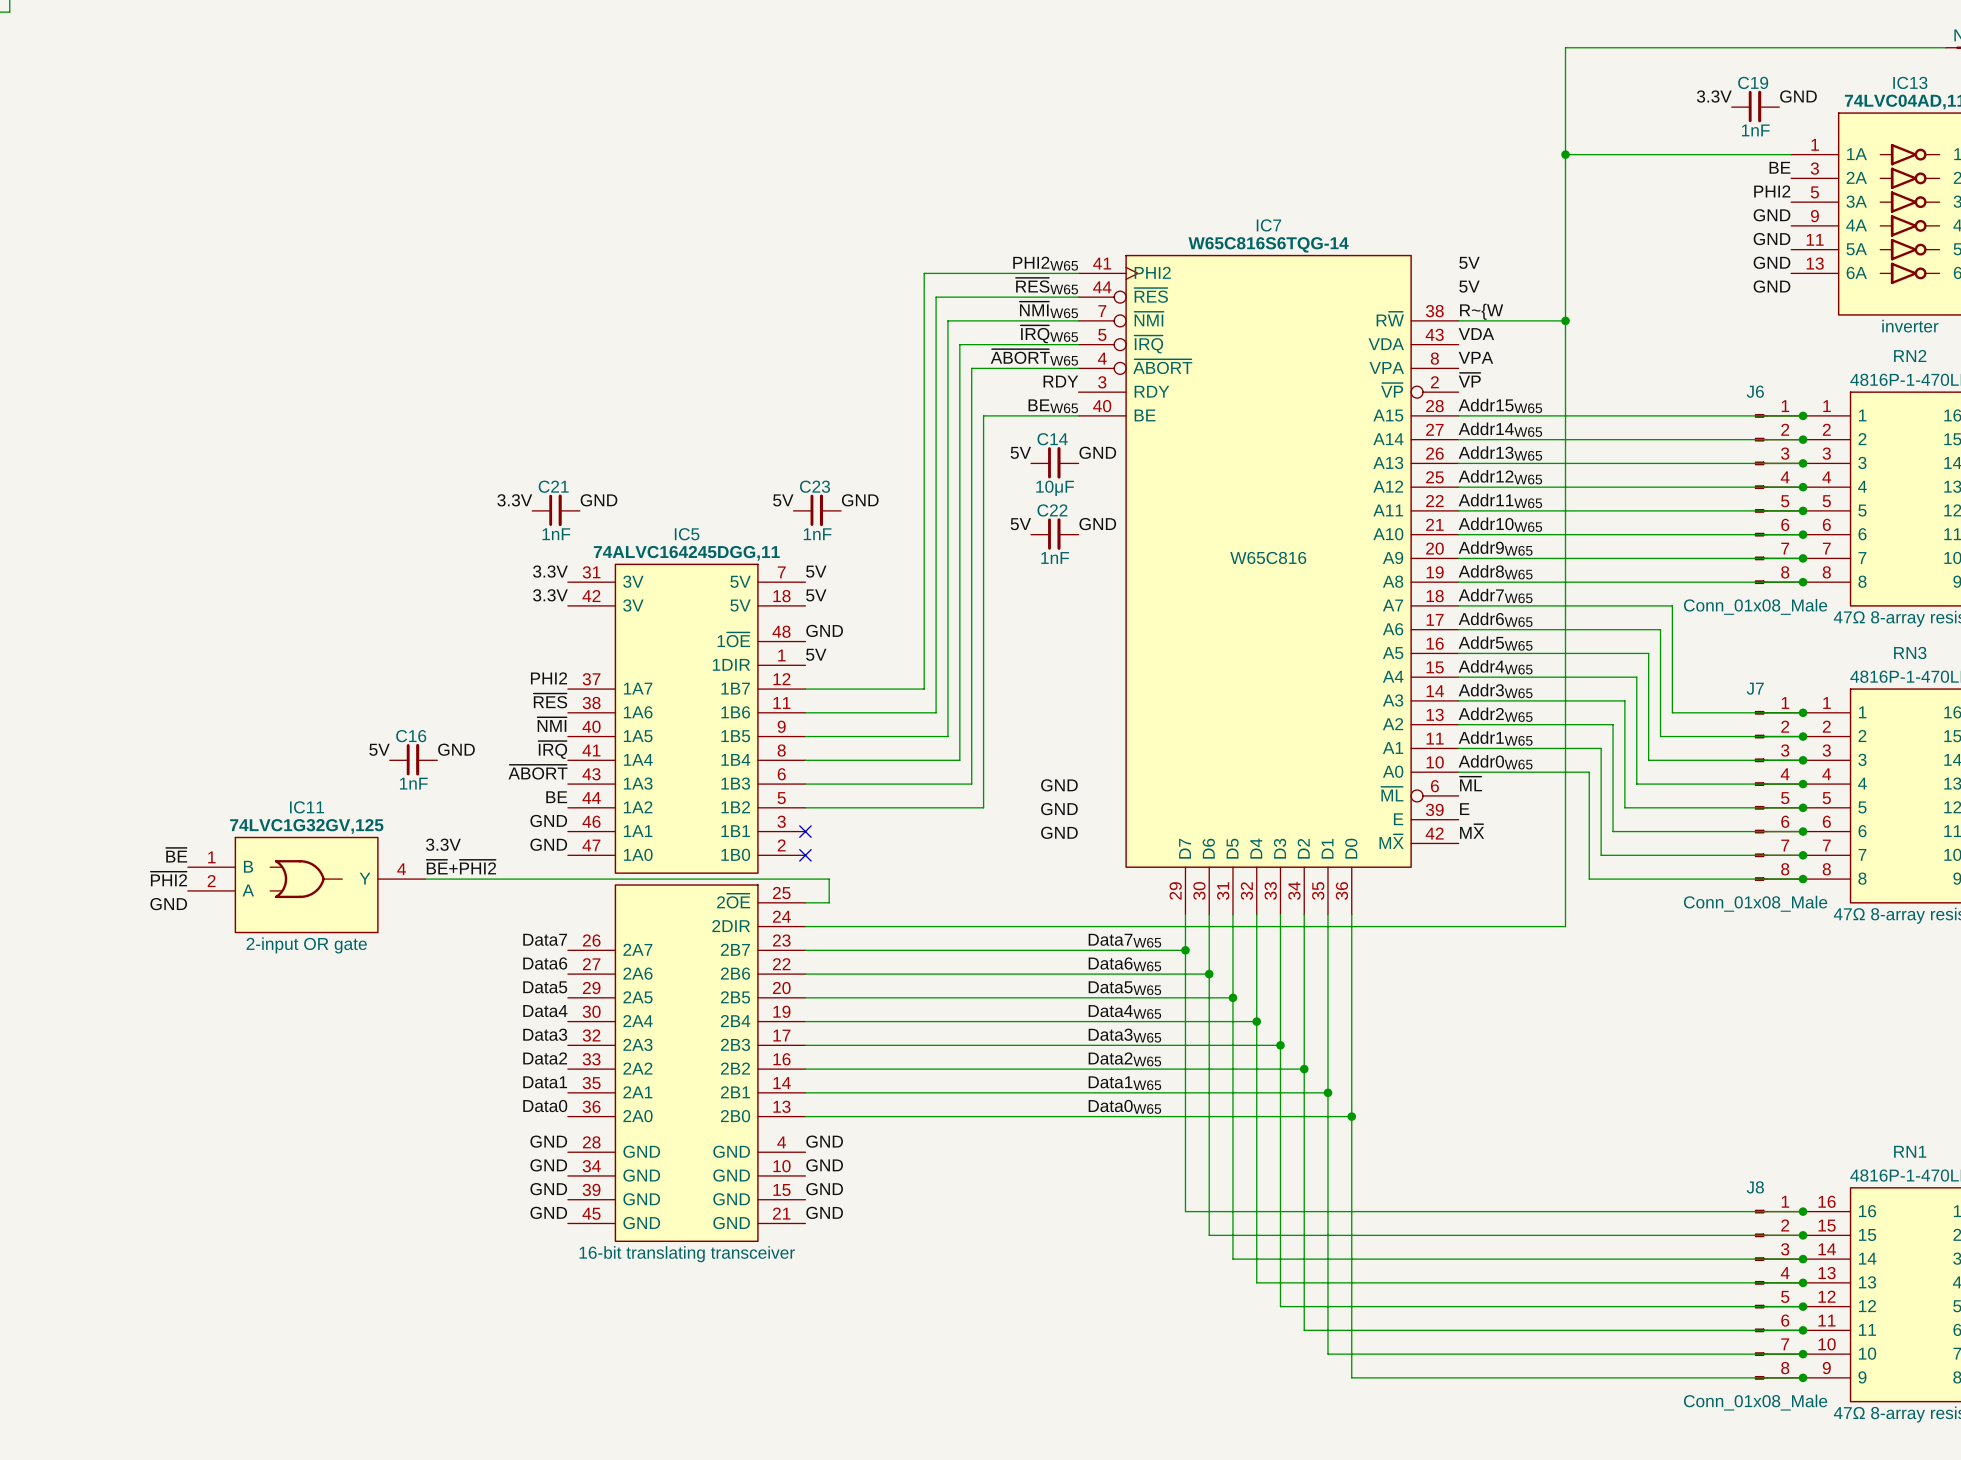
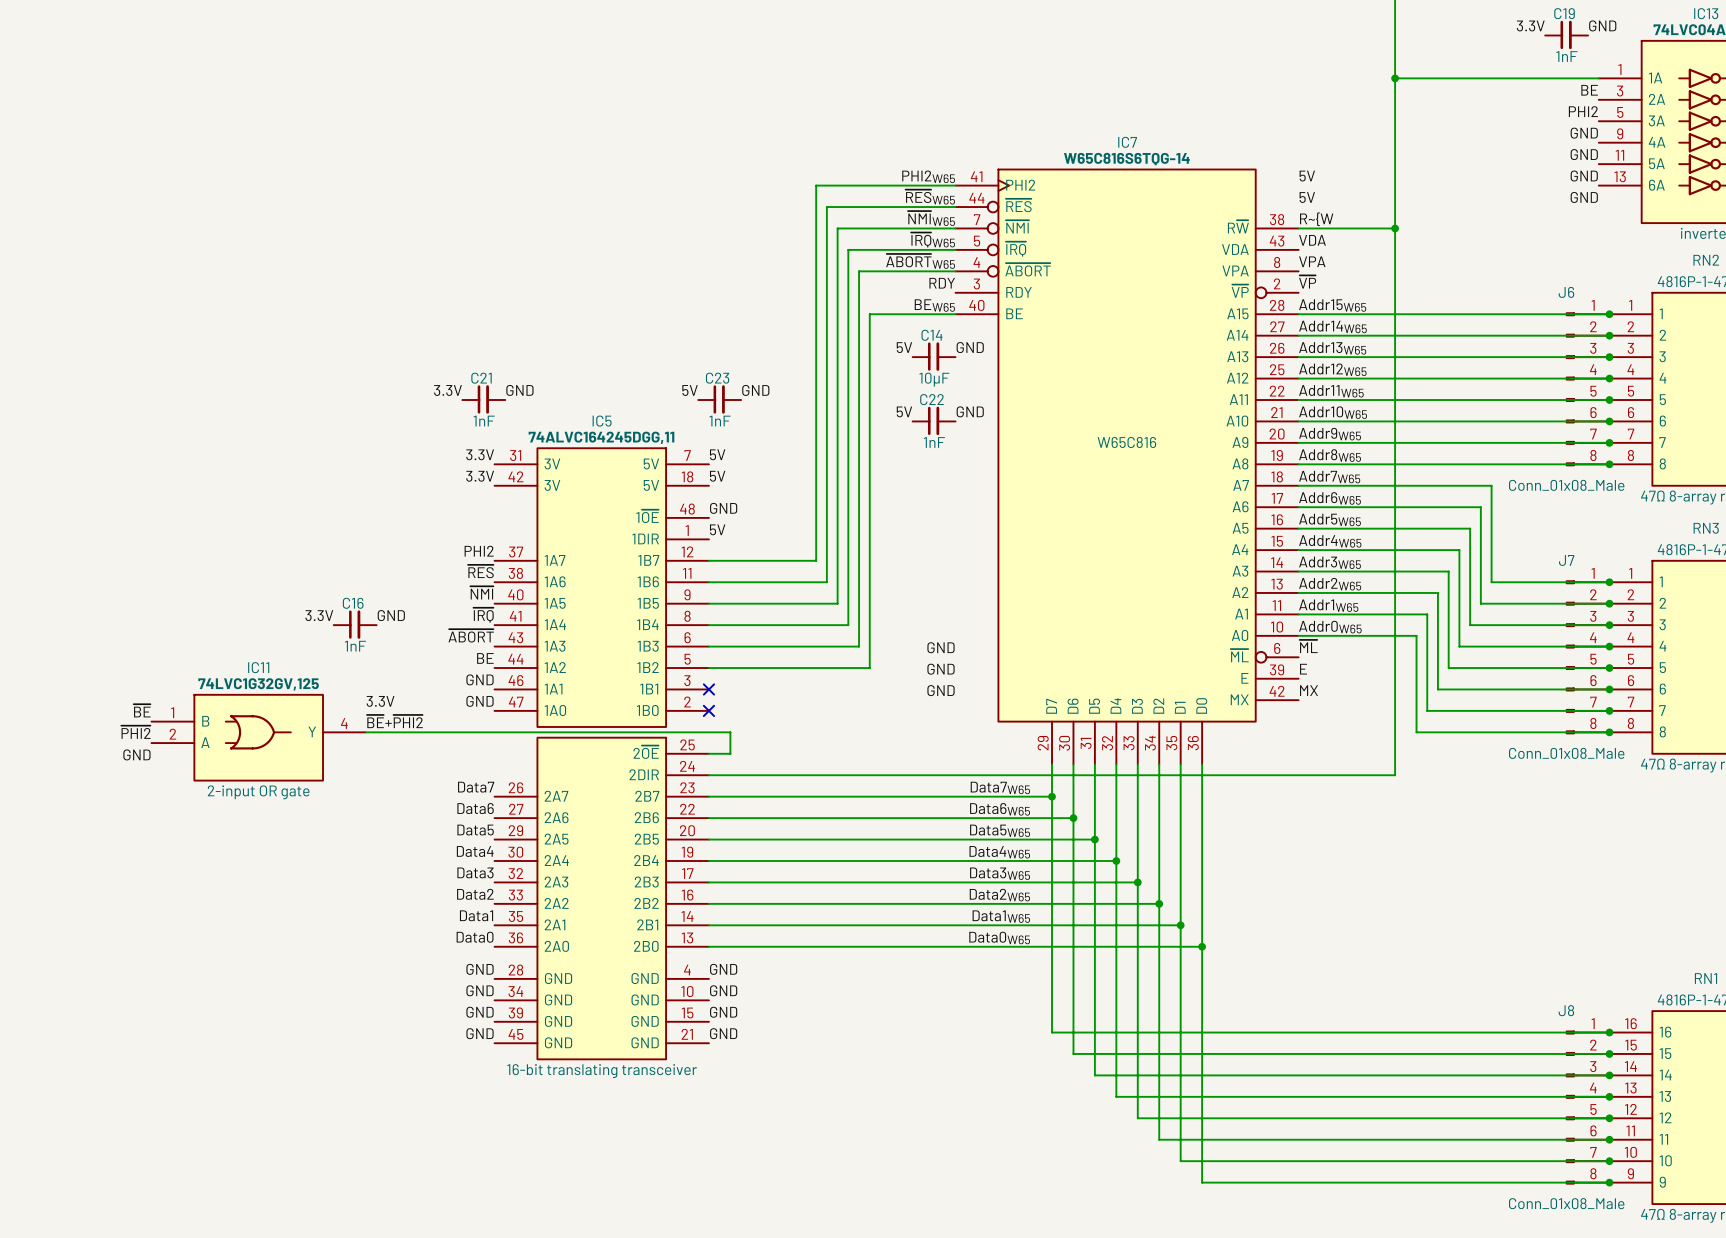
label: 5V (379, 749) -> 3.3V (319, 615)
label: M~{X} (1472, 831) -> MX (1309, 690)
IC7 pin name: M~{X} (1391, 841) -> MX (1239, 699)

